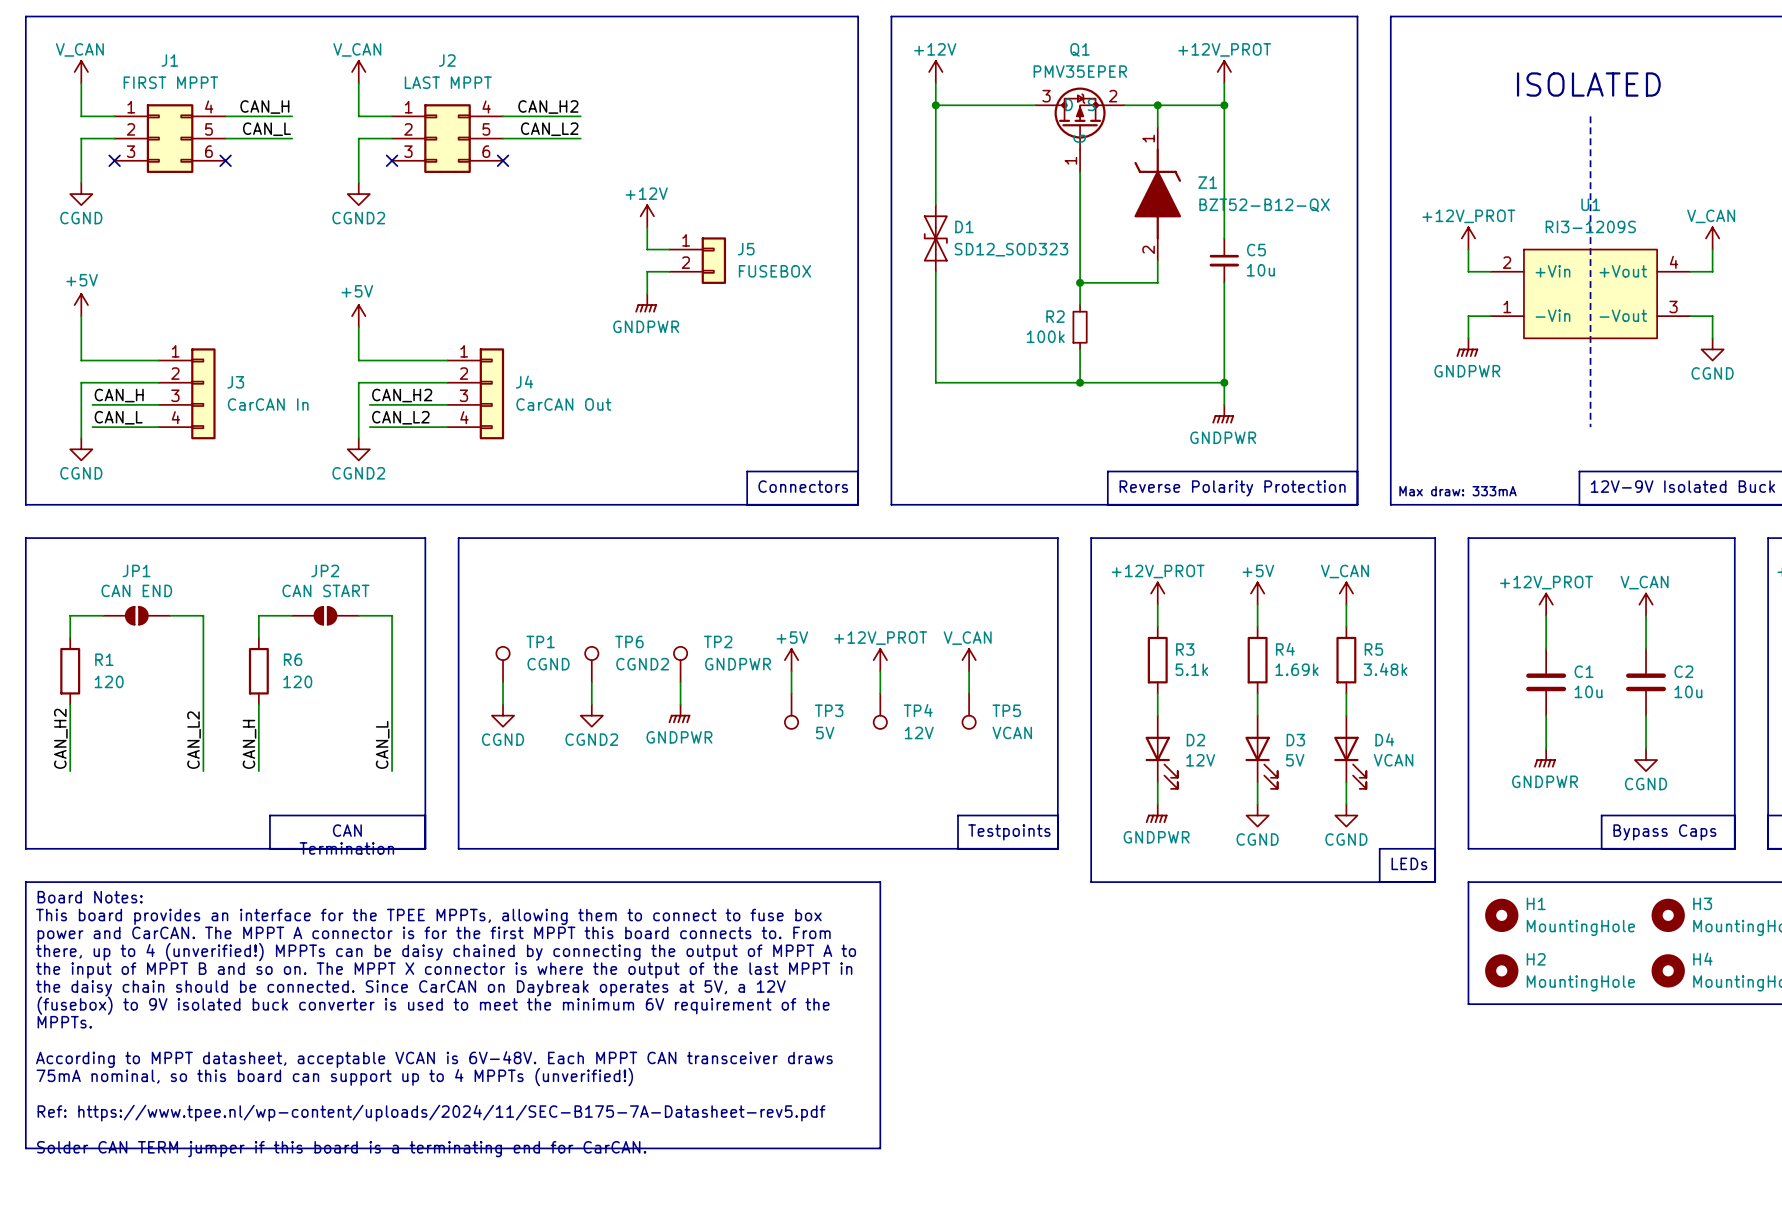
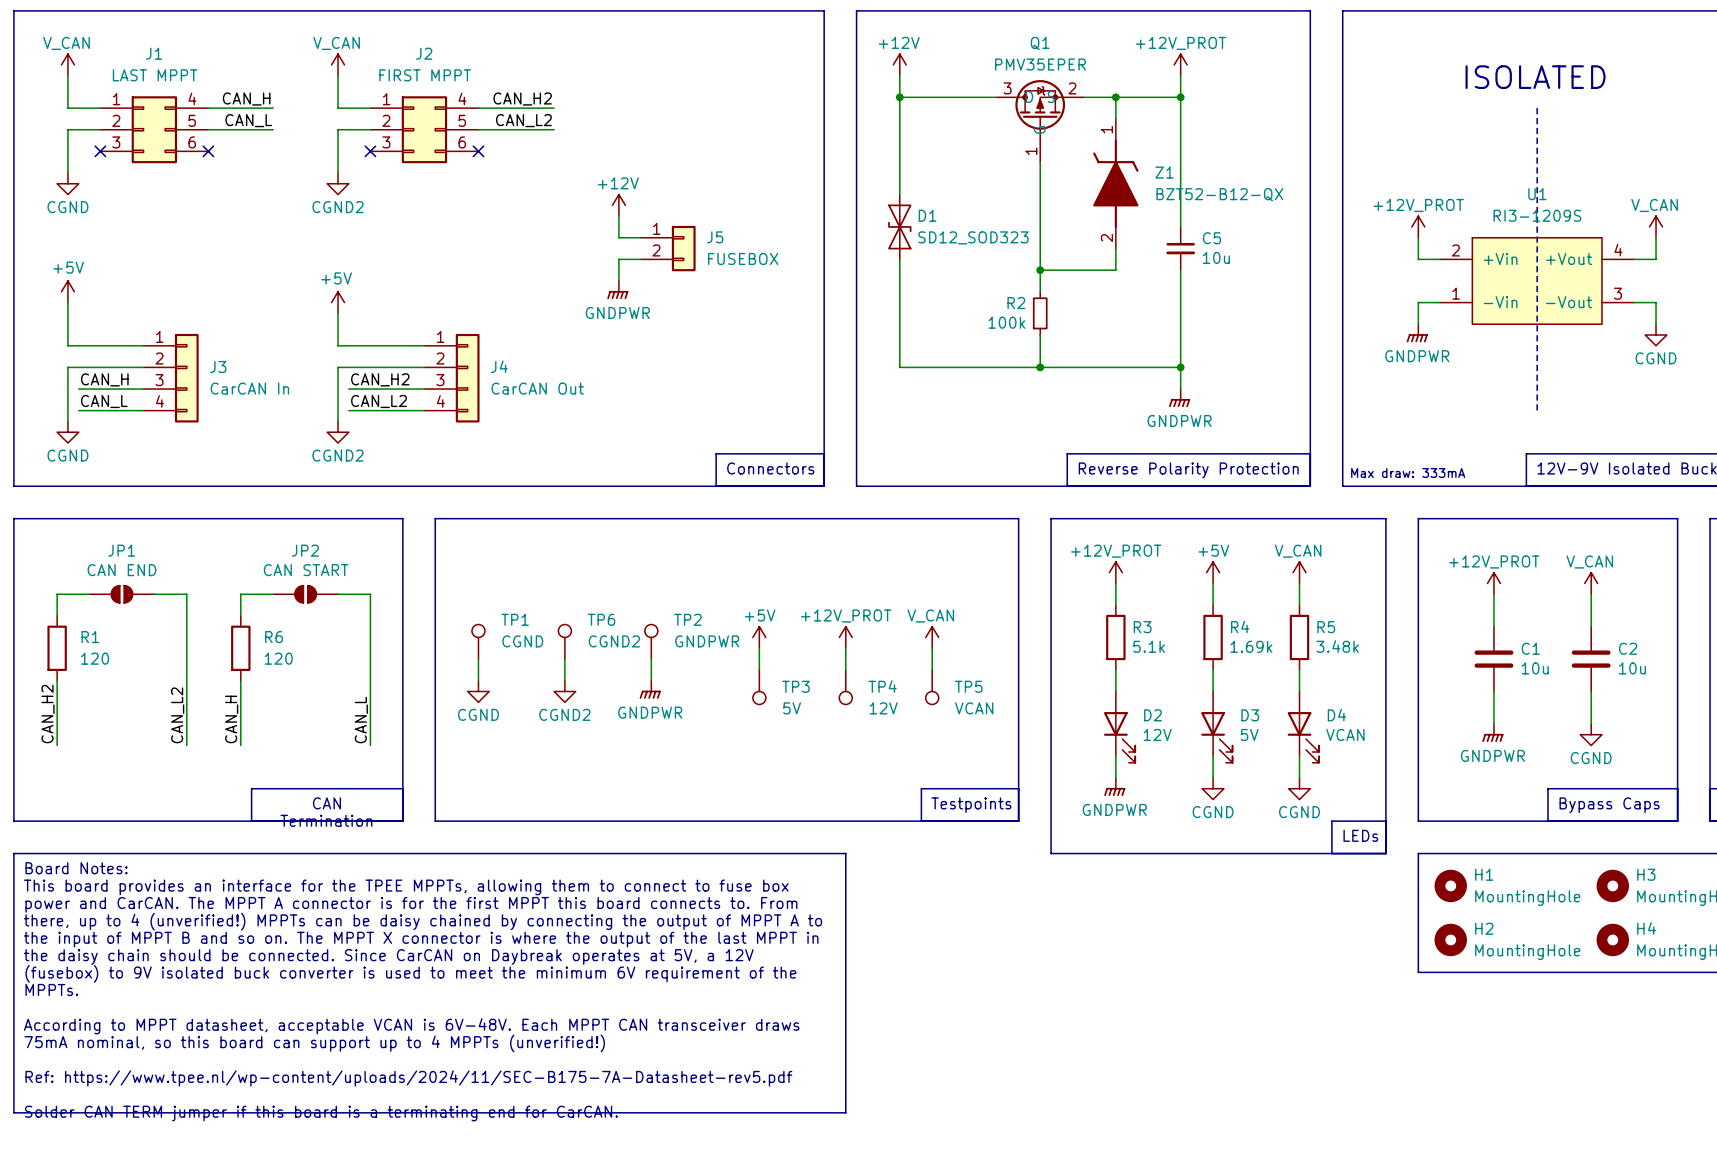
J1 value: FIRST MPPT (170, 82) -> LAST MPPT (155, 75)
J2 value: LAST MPPT (448, 82) -> FIRST MPPT (425, 75)

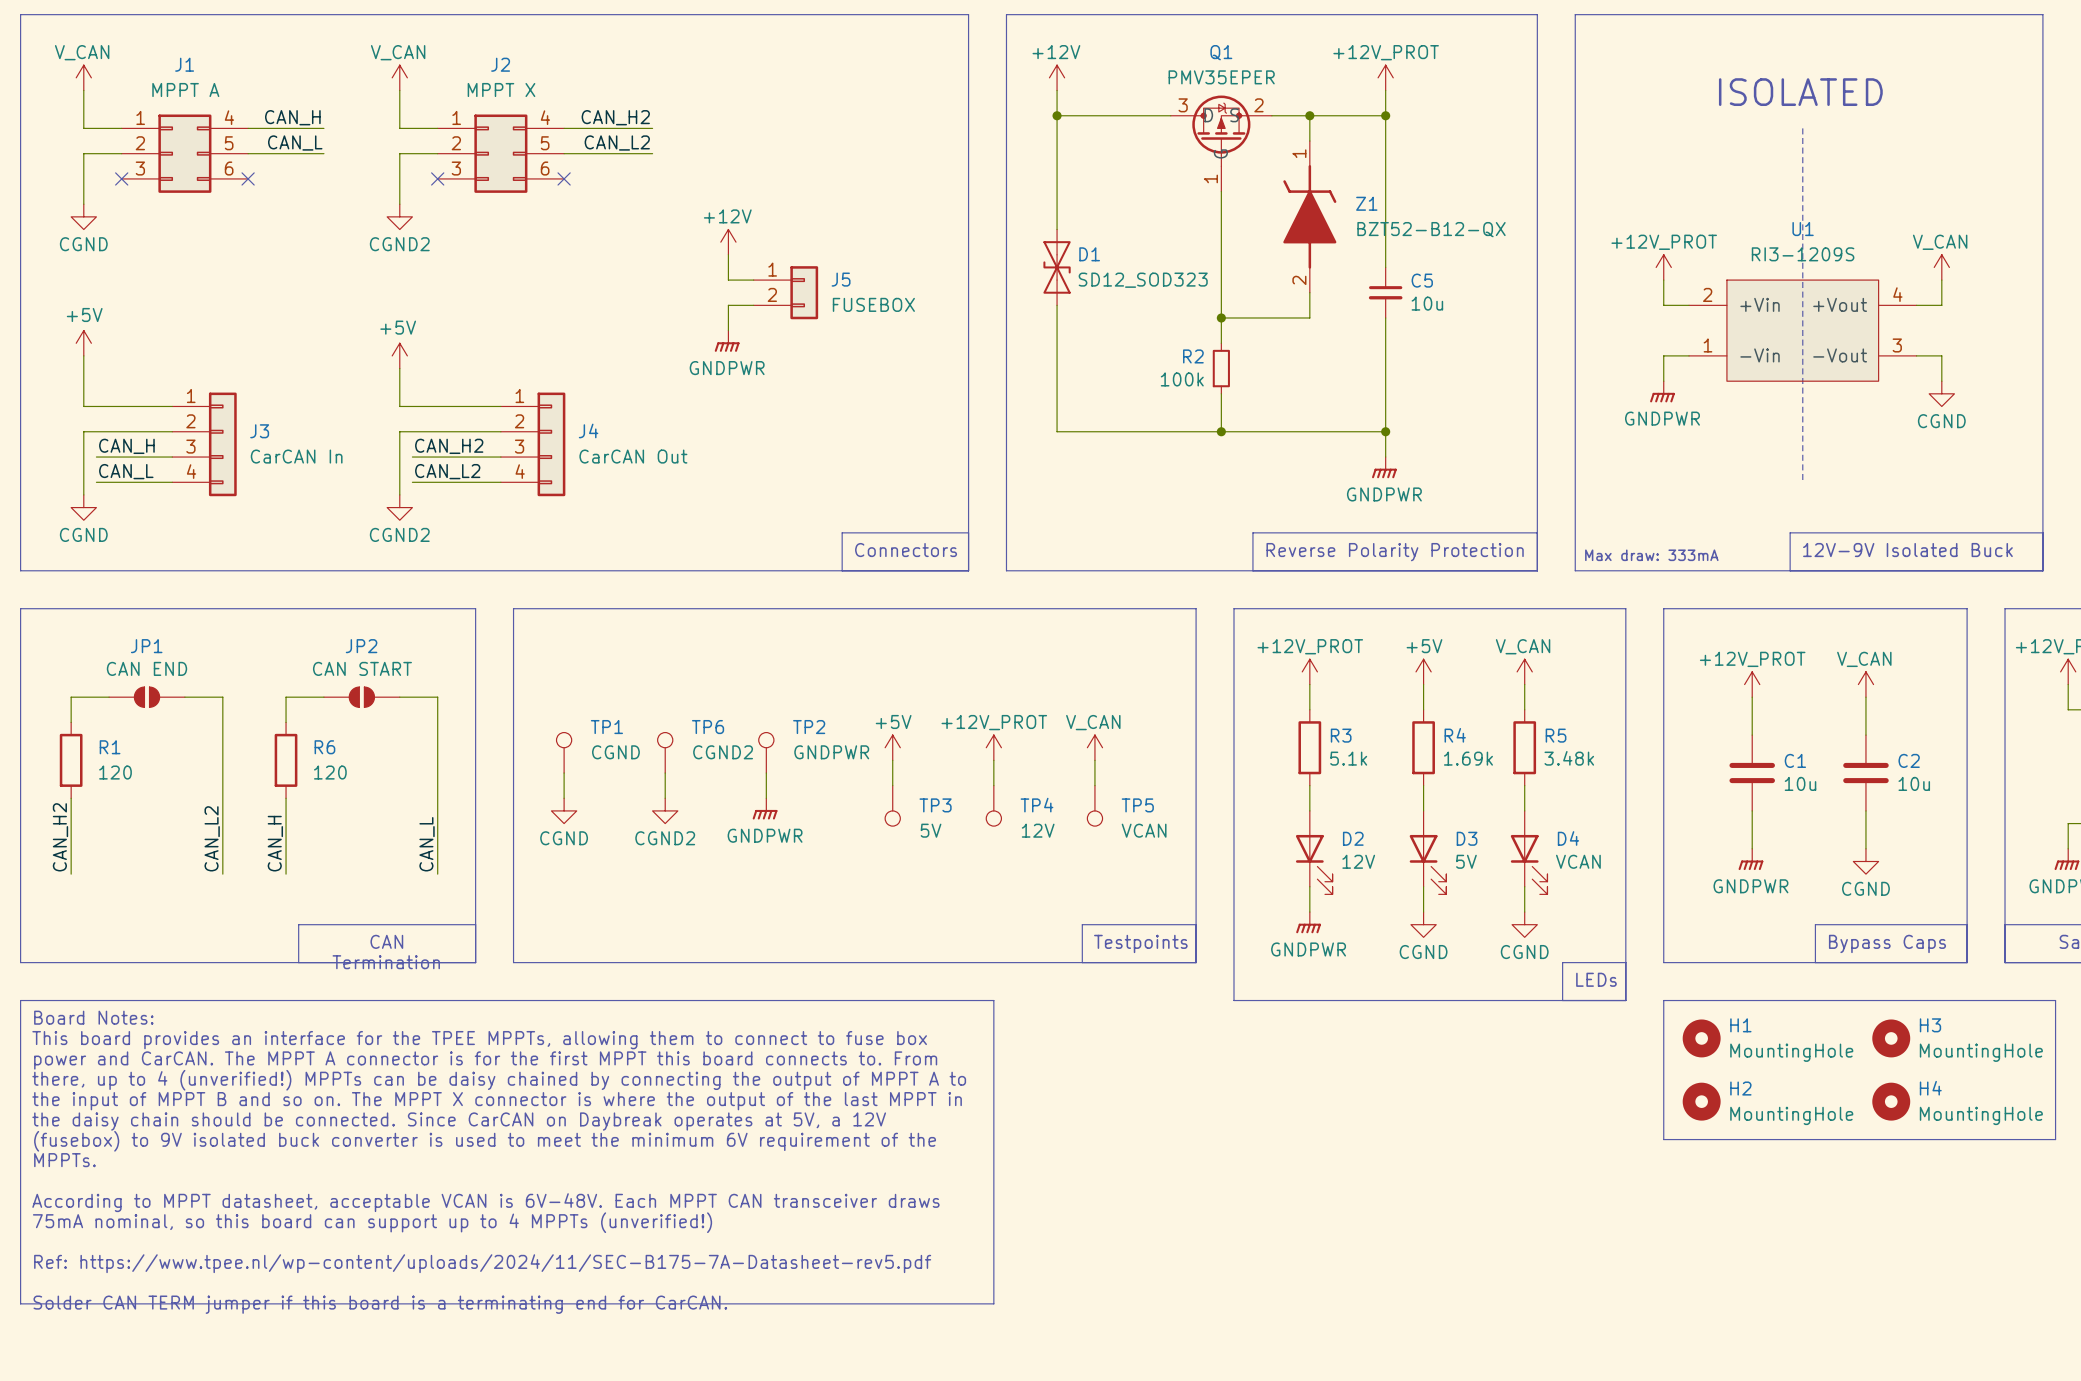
J1 value: LAST MPPT (155, 75) -> MPPT A (185, 90)
J2 value: FIRST MPPT (425, 75) -> MPPT X (501, 90)

